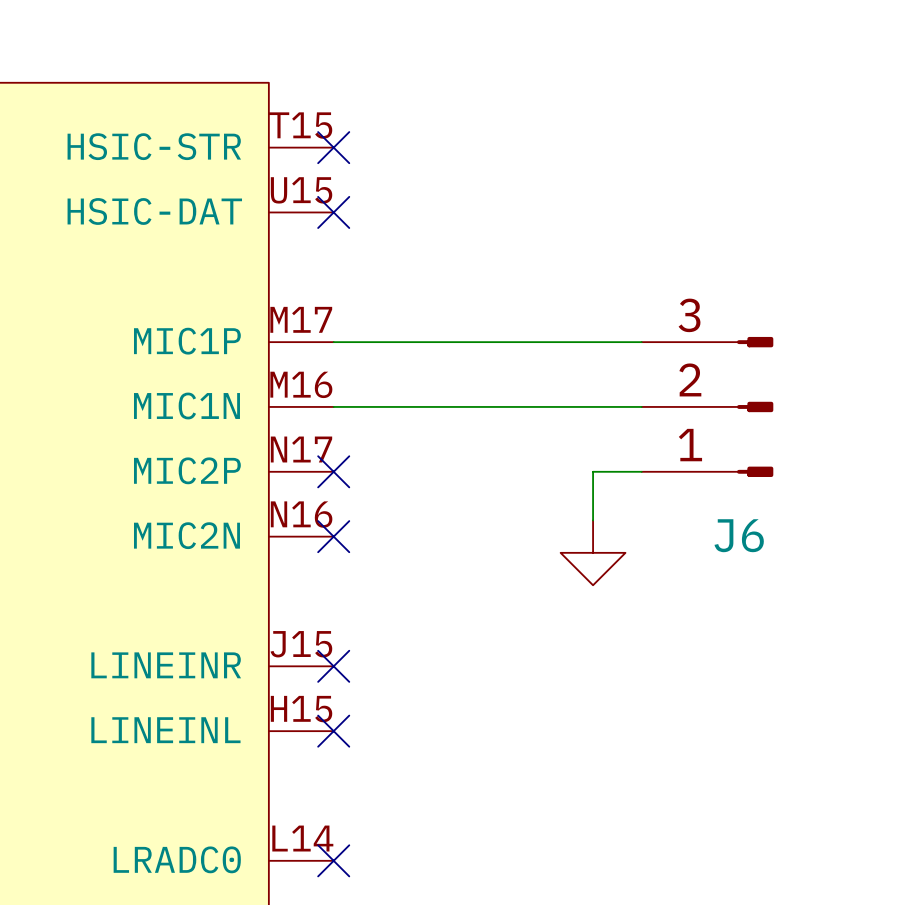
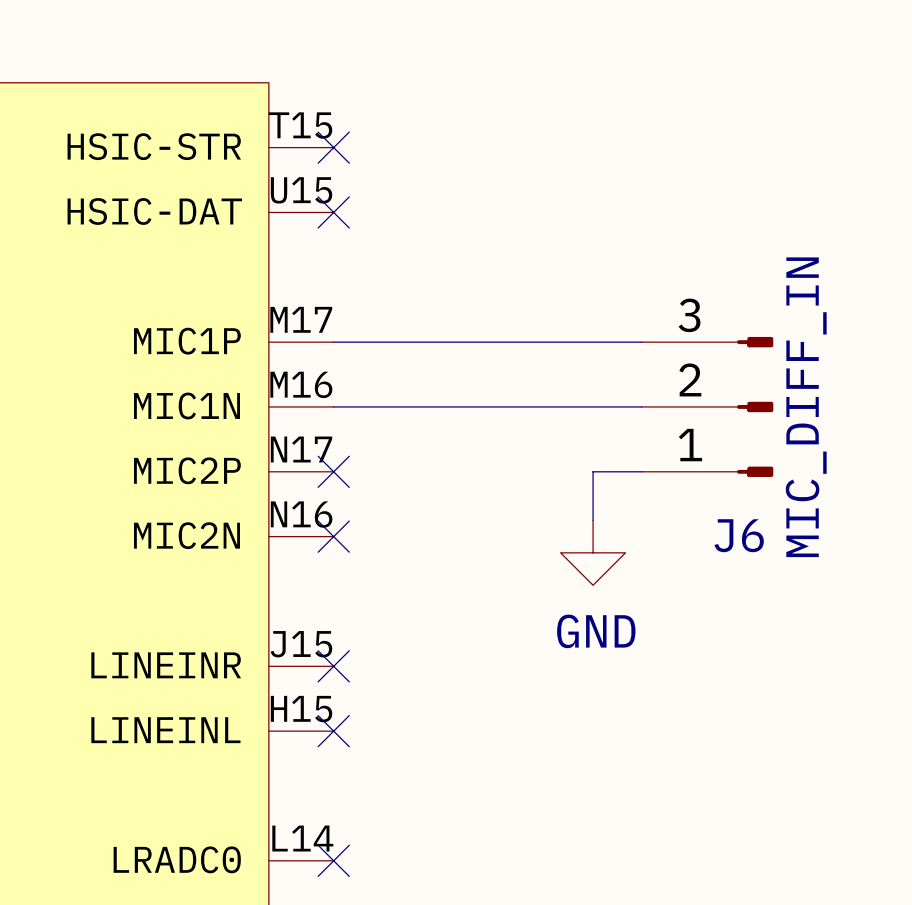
J6 value: none -> MIC_DIFF_IN (806, 407)
power symbol text: none -> GND (596, 631)

